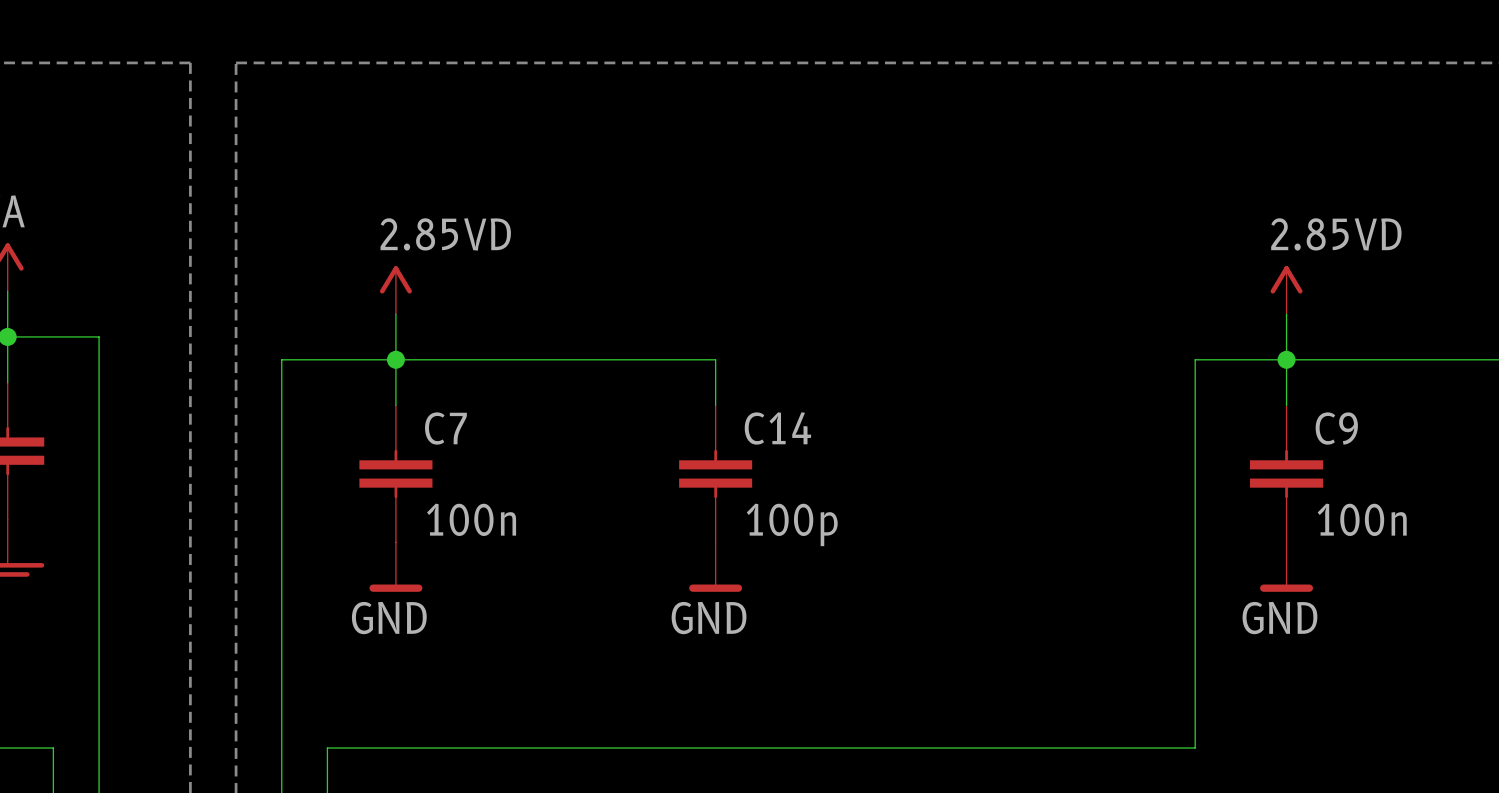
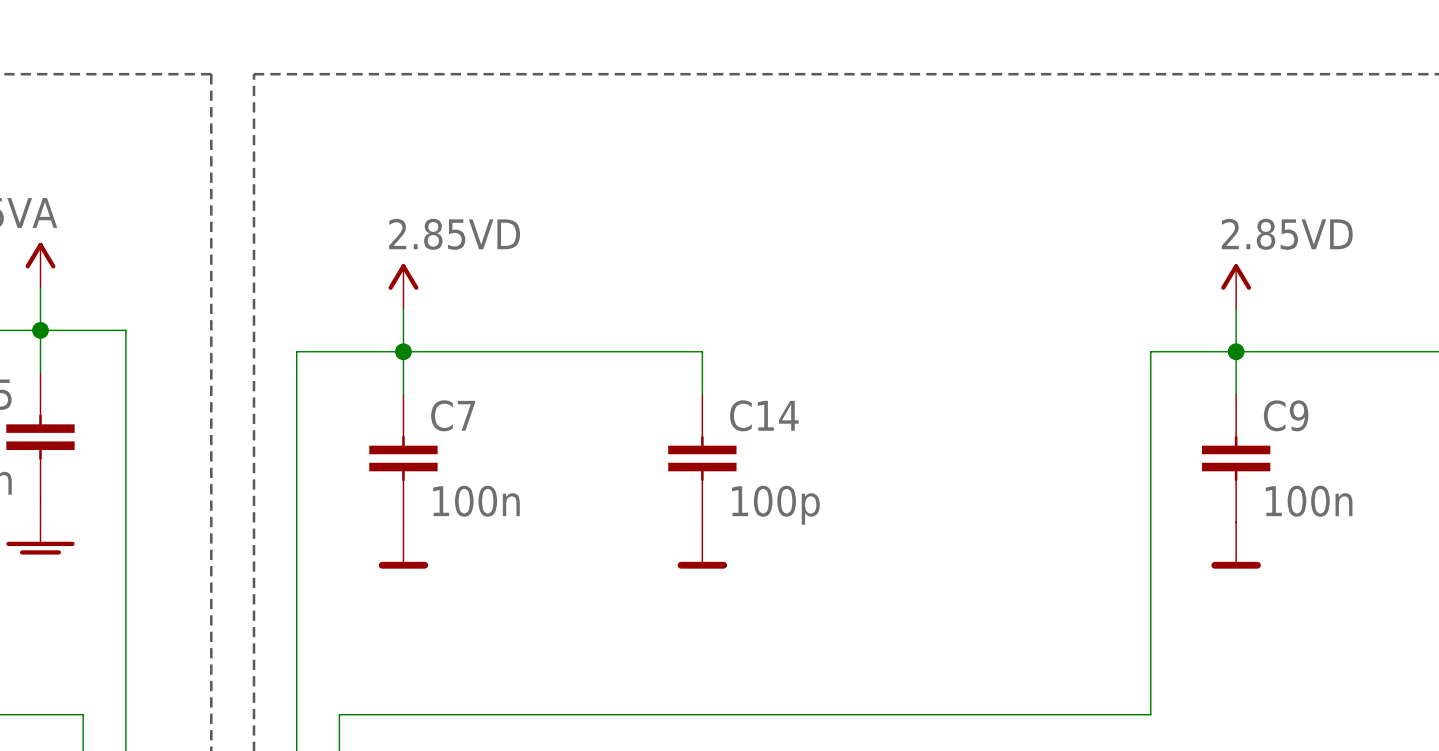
power symbol text: GND (389, 618) -> none
power symbol text: GND (709, 618) -> none
power symbol text: GND (1279, 618) -> none

